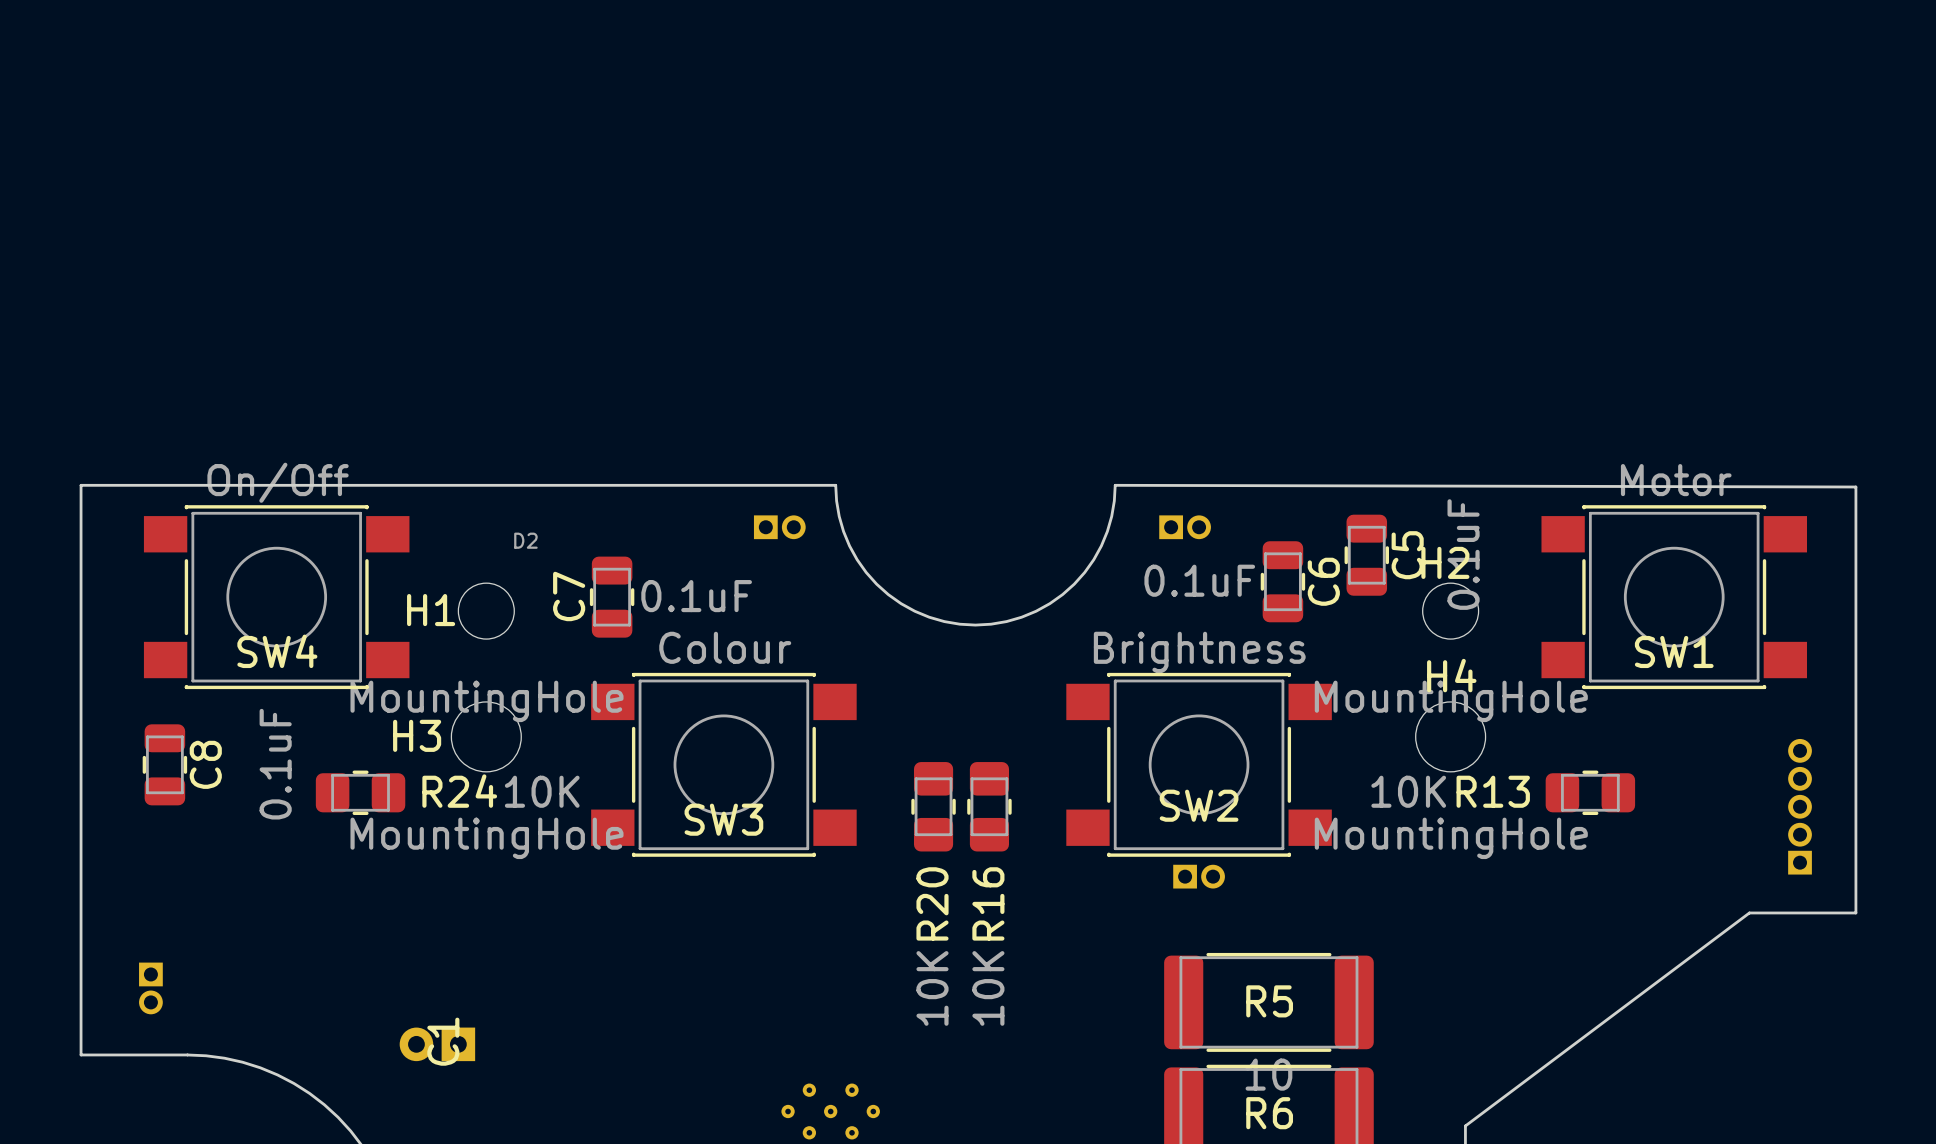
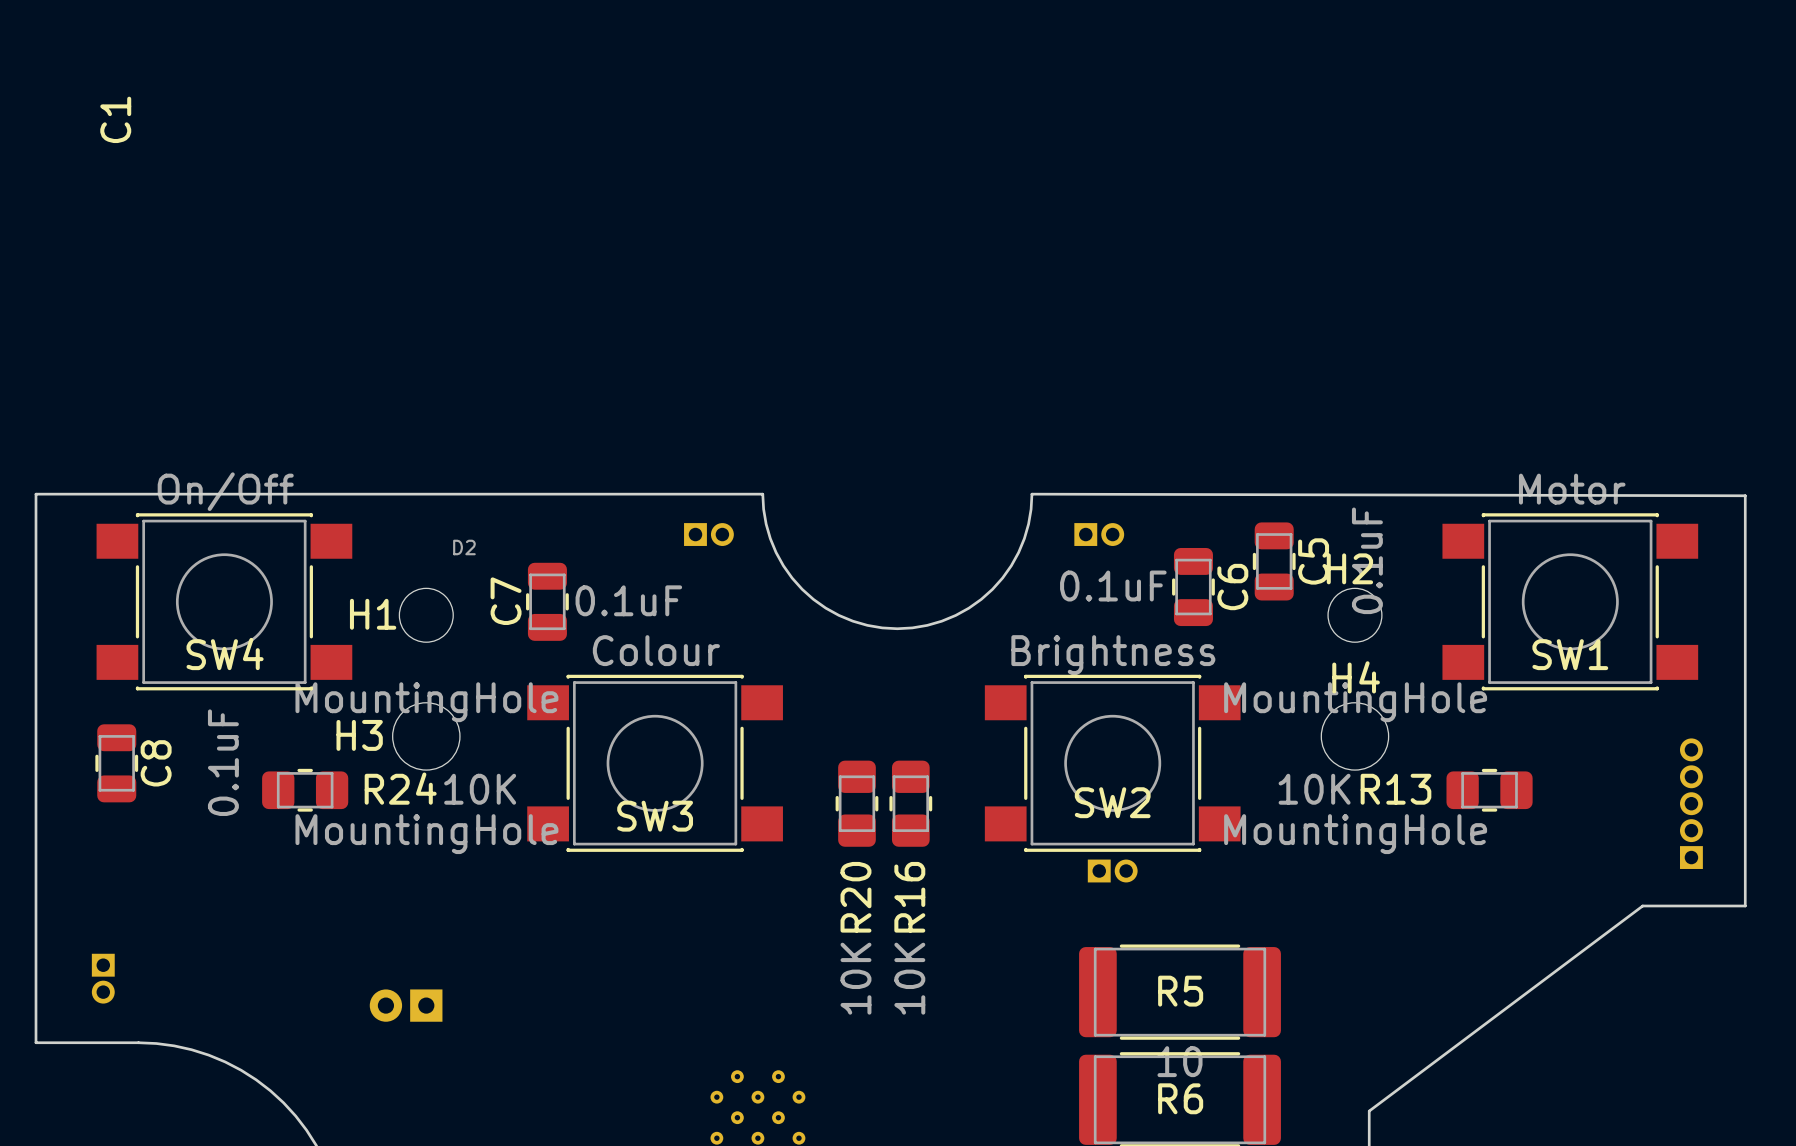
C1 position: (443, 1041) -> (115, 119)
part position: (437, 1044) -> (406, 1005)

